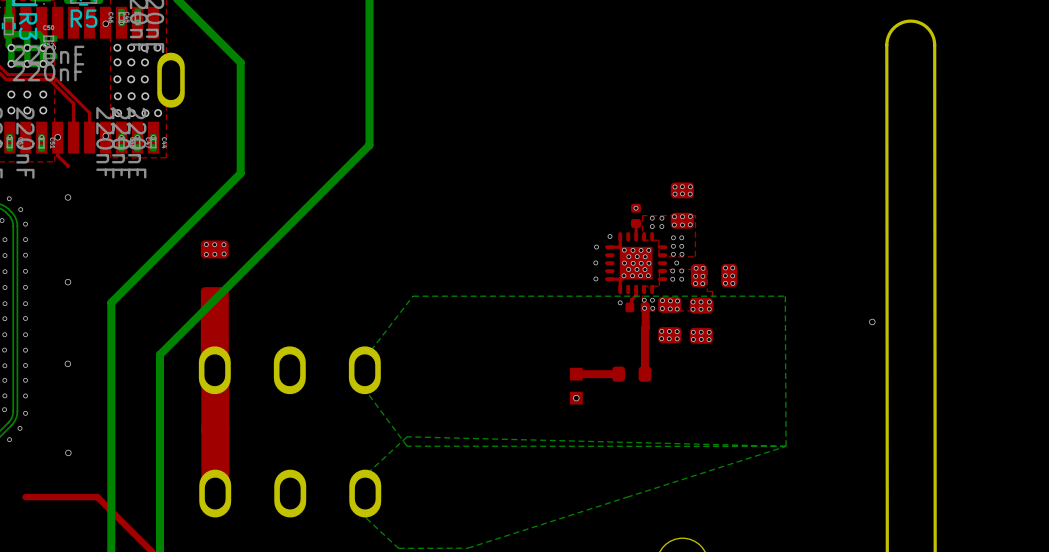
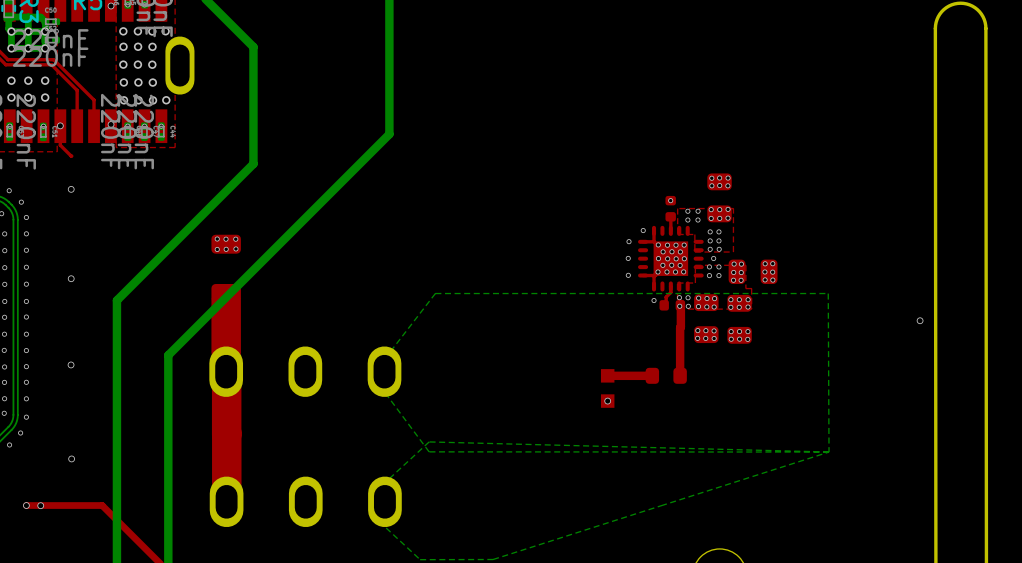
via: none -> (26, 505)
via: none -> (40, 505)

